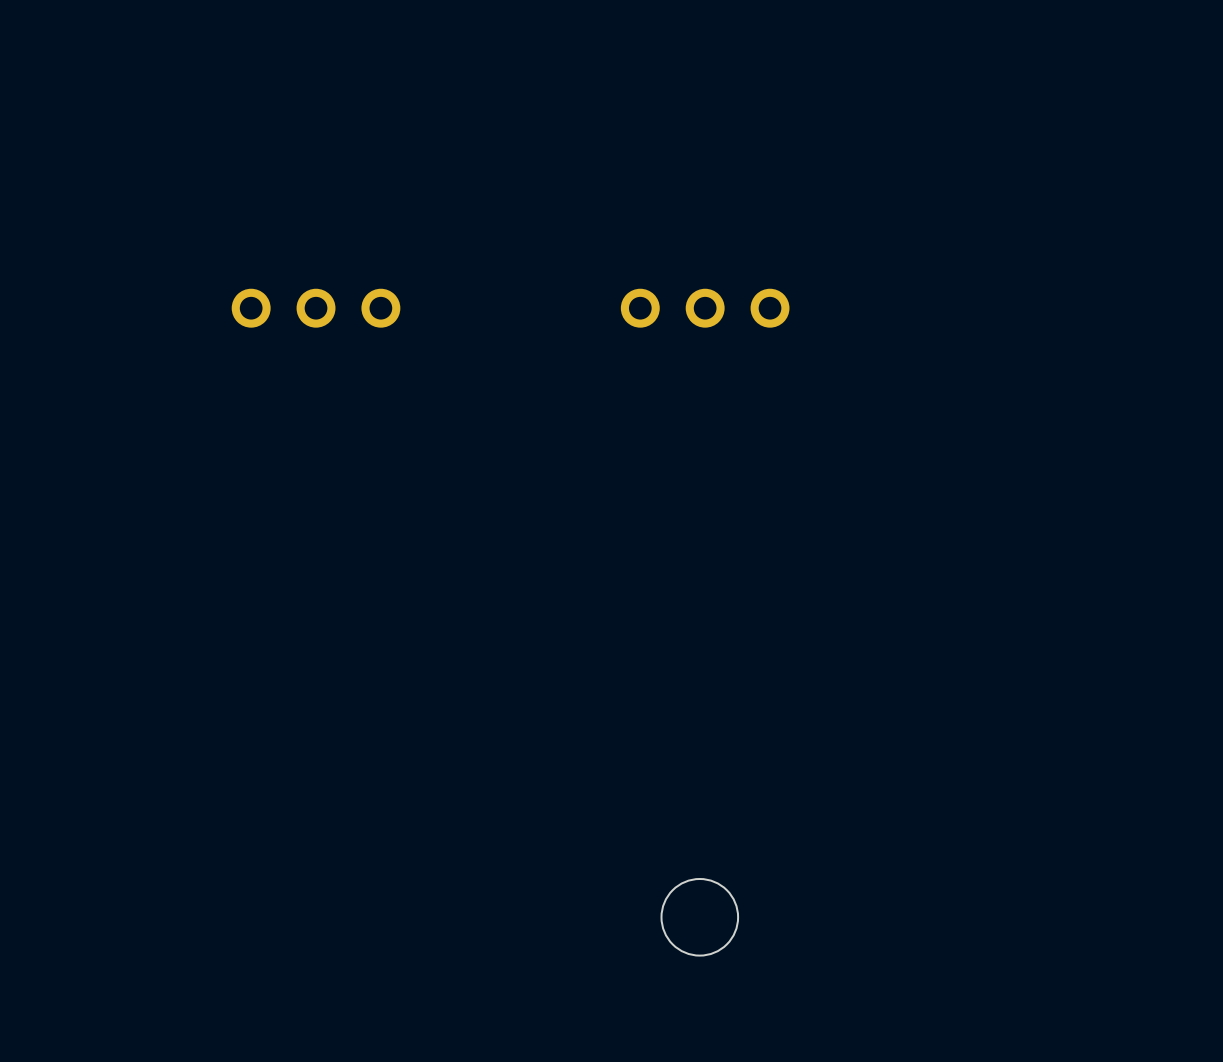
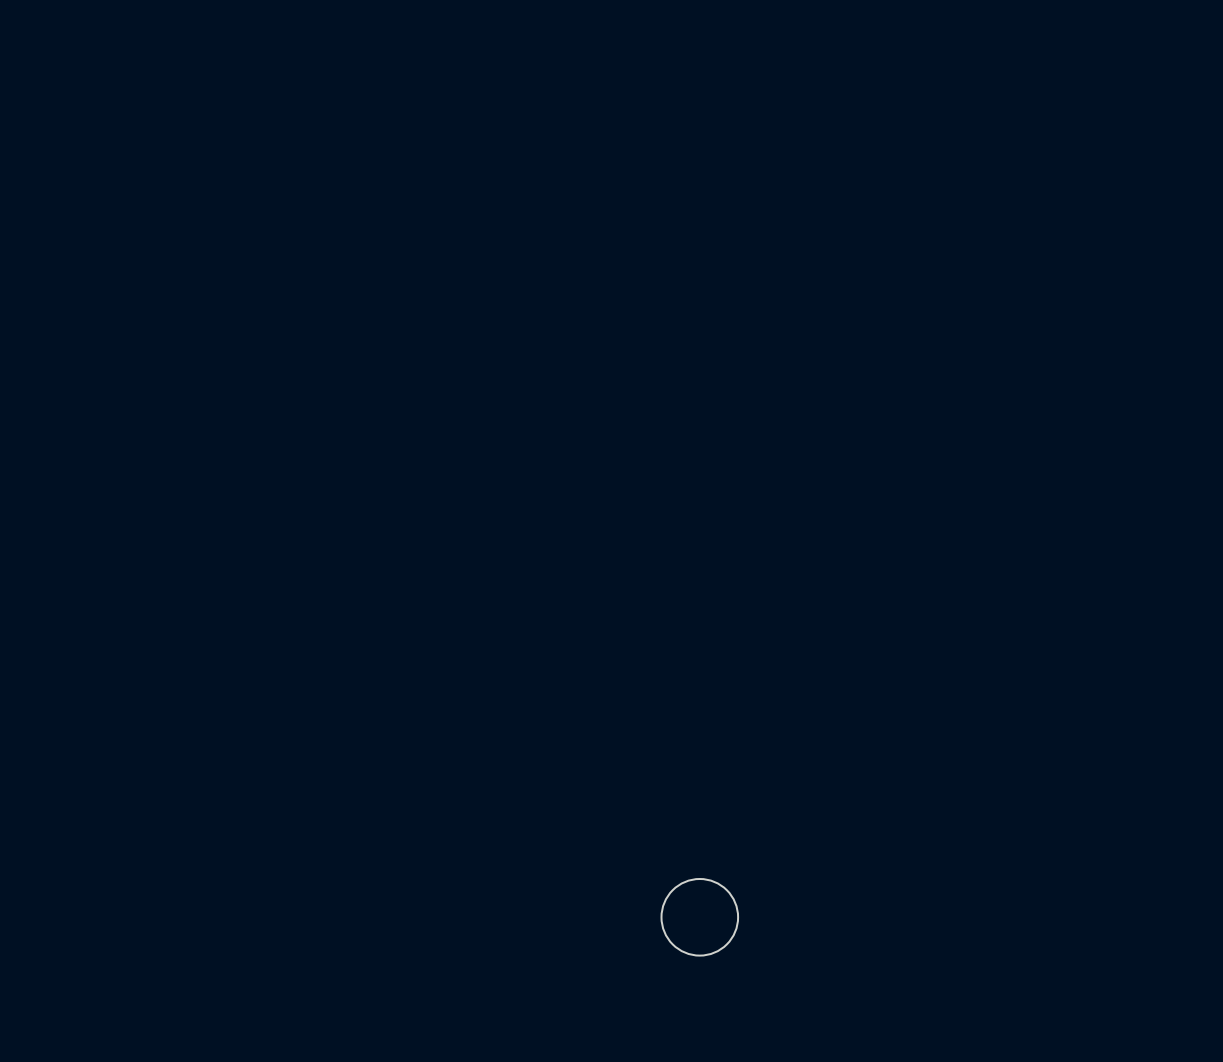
part: (316, 308) -> none
part: (705, 308) -> none

